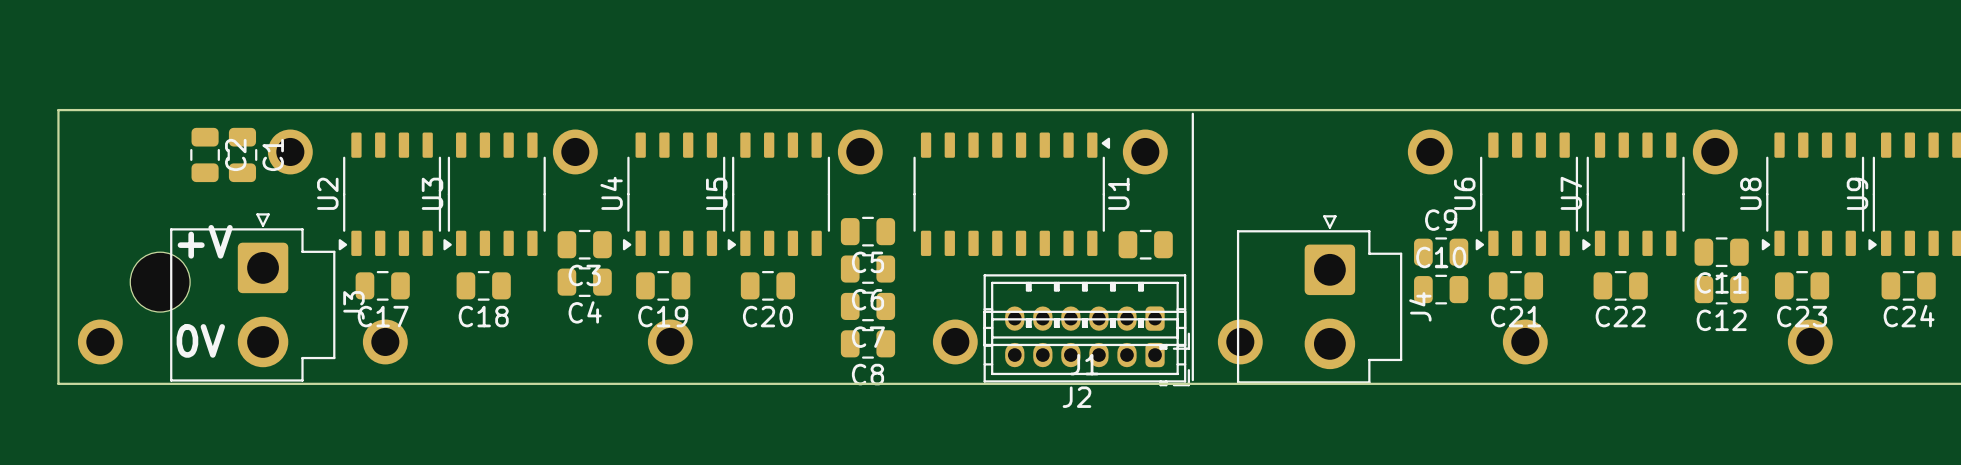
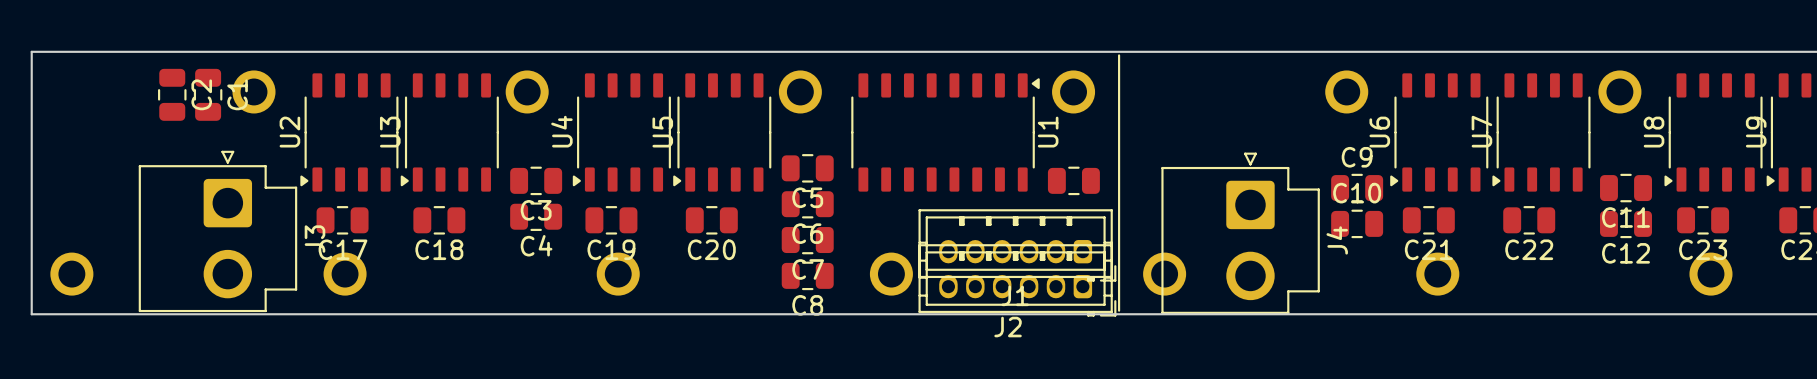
text: +V (205, 241) -> none
part: (160, 282) -> none
text: 0V (200, 340) -> none

